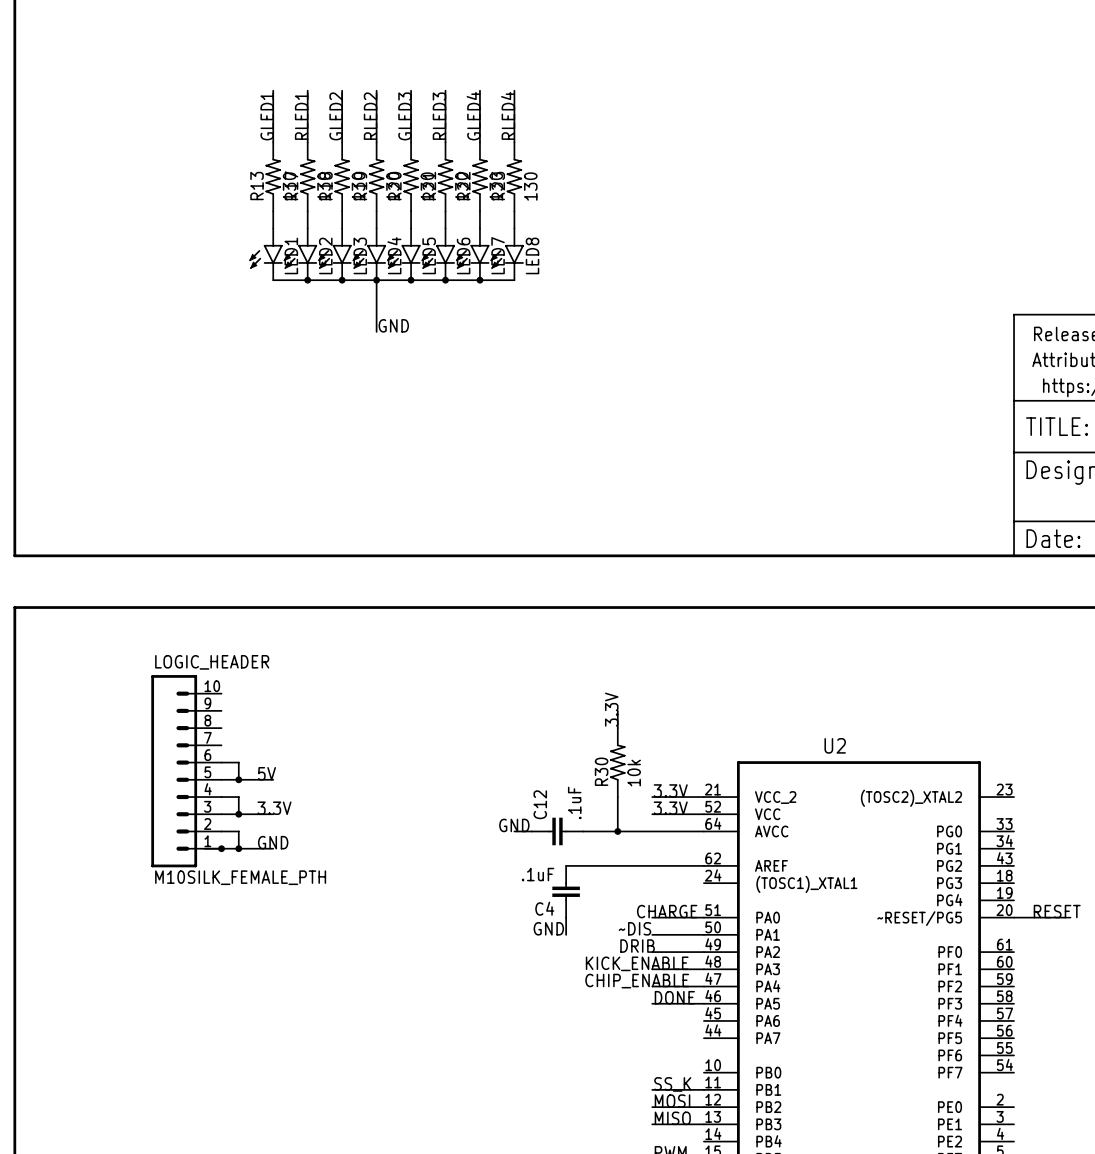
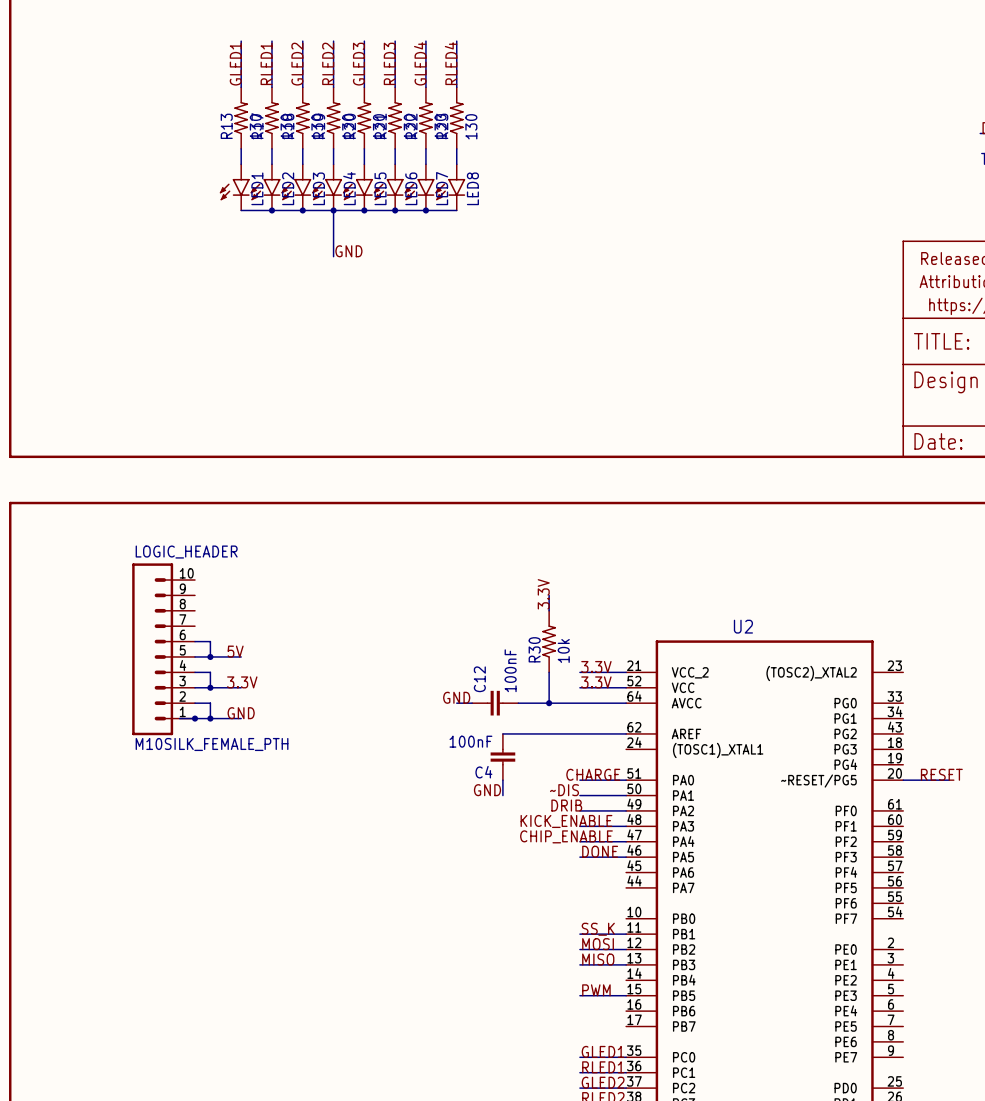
C12 value: .1uF (574, 802) -> 100nF (510, 670)
C4 value: .1uF (538, 874) -> 100nF (470, 741)

